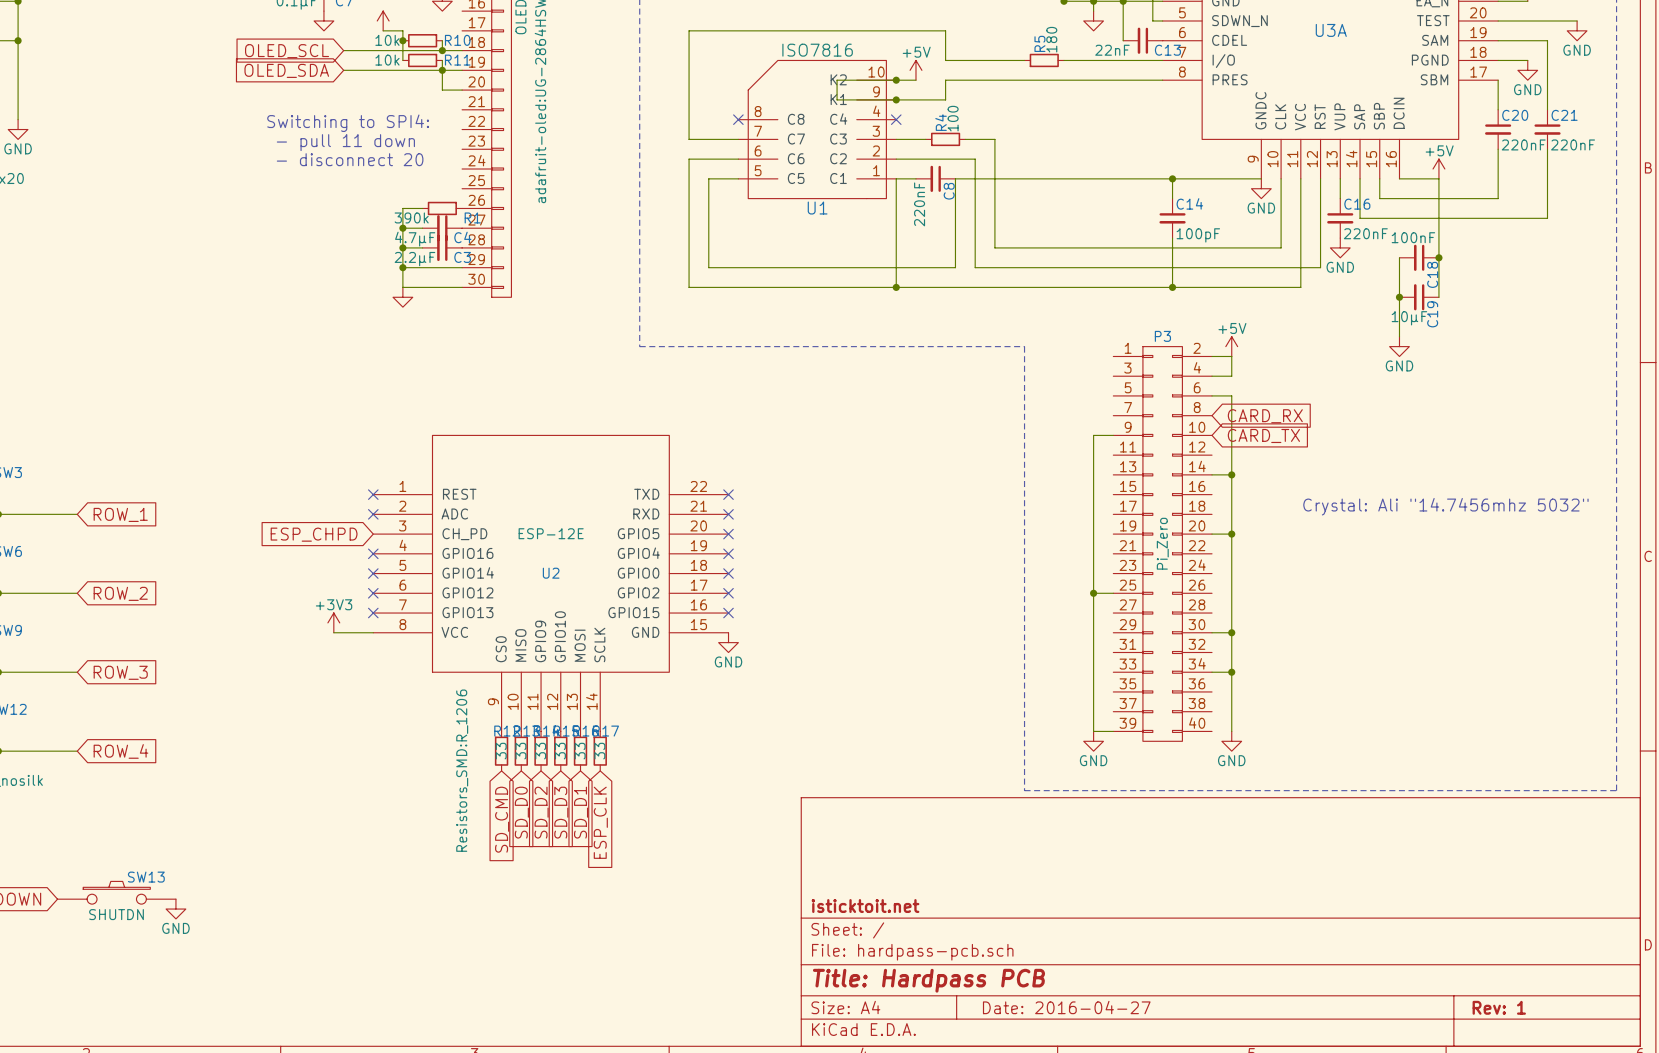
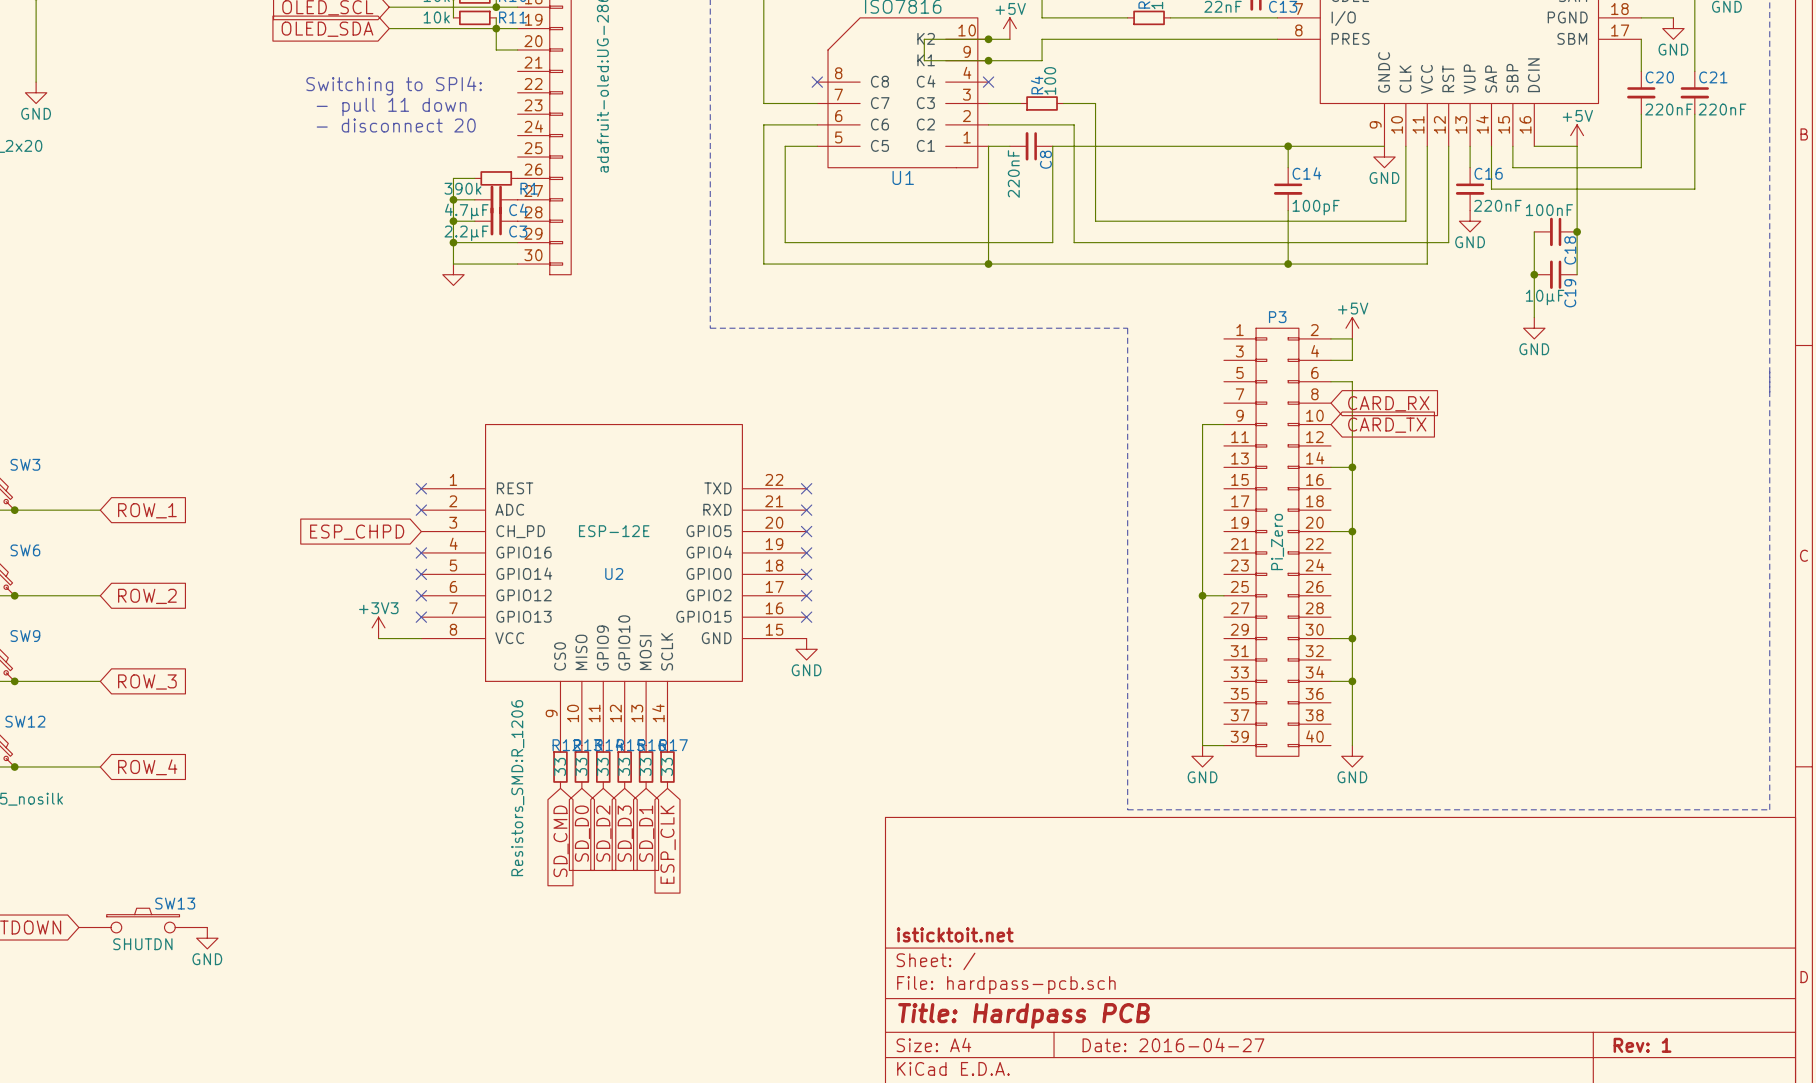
text: Crystal: Ali "14.7456mhz 5032" (1445, 506) -> none

